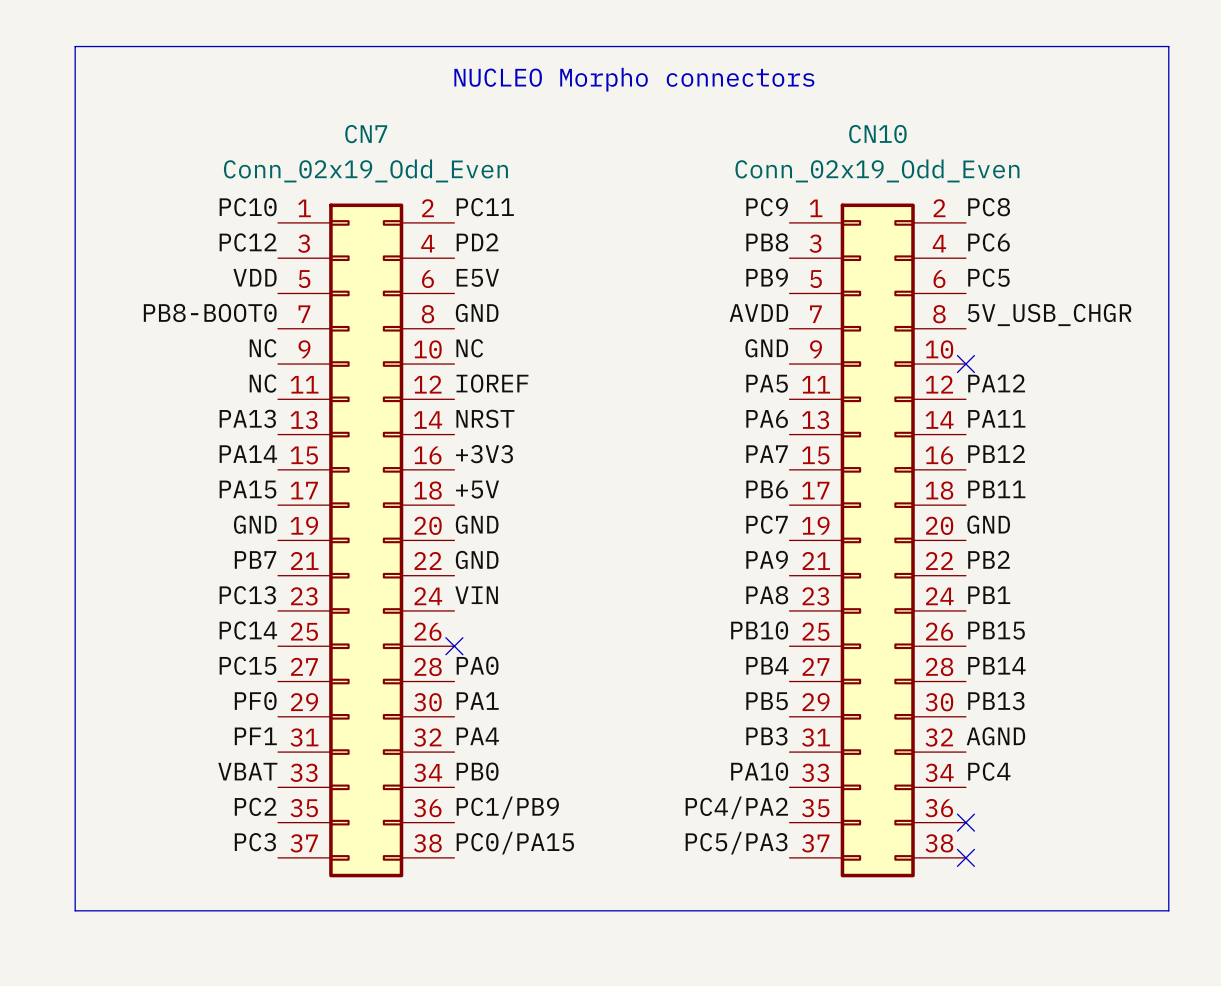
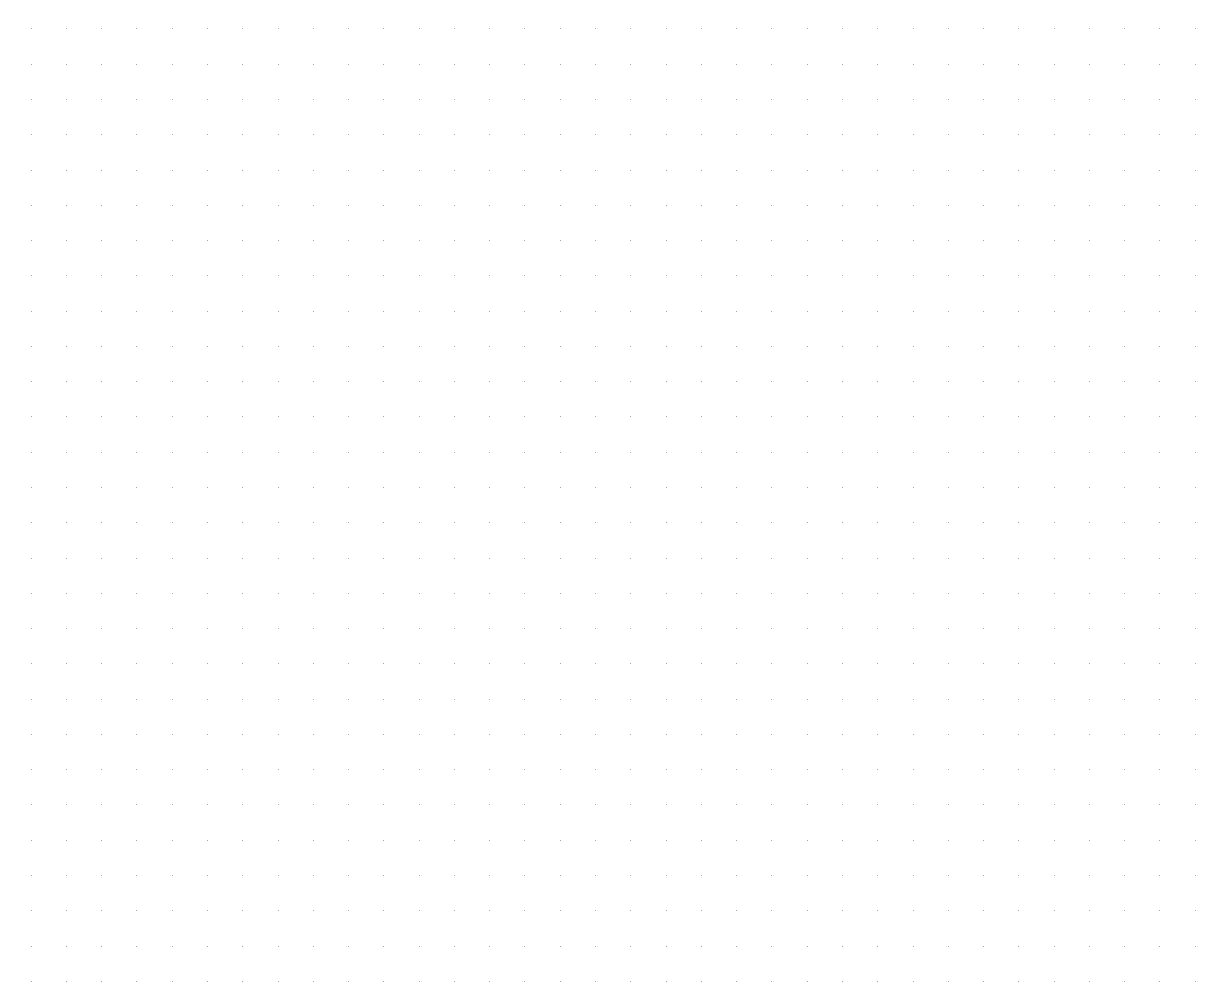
line: (75, 46) (1168, 46) (1168, 910) (75, 910) (75, 46) -> none
text: NUCLEO Morpho connectors (634, 79) -> none
label: PC10 (248, 207) -> none
label: PC11 (485, 207) -> none
label: PC9 (767, 207) -> none
label: PC8 (989, 207) -> none
label: PC12 (248, 242) -> none
label: PD2 (477, 242) -> none
label: PB8 (767, 242) -> none
label: PC6 (988, 242) -> none
label: VDD (255, 277) -> none
label: E5V (477, 277) -> none
label: PB9 (767, 277) -> none
label: PC5 (988, 277) -> none
label: PB8-BOOT0 (210, 313) -> none
label: GND (477, 313) -> none
label: AVDD (758, 313) -> none
label: 5V_USB_CHGR (1049, 314) -> none
label: NC (263, 348) -> none
label: NC (469, 348) -> none
label: GND (766, 348) -> none
no-connect mark: (965, 364) -> none
label: NC (263, 383) -> none
label: IOREF (492, 383) -> none
label: PA5 (767, 383) -> none
label: PA12 (996, 383) -> none
label: PA13 (247, 418) -> none
label: NRST (485, 418) -> none
label: PA6 (767, 418) -> none
label: PA11 (996, 418) -> none
label: PB12 (996, 453) -> none
label: PA14 (248, 454) -> none
label: +3V3 (484, 454) -> none
label: PA7 (767, 454) -> none
label: PA15 (247, 489) -> none
label: +5V (477, 489) -> none
label: PB6 (767, 489) -> none
label: PB11 (996, 489) -> none
label: GND (255, 524) -> none
label: GND (477, 524) -> none
label: PC7 (767, 524) -> none
label: GND (988, 524) -> none
CN7: Conn_02x19_Odd_Even (366, 540) -> none
CN10: Conn_02x19_Odd_Even (877, 540) -> none
label: PB7 (255, 559) -> none
label: GND (477, 559) -> none
label: PA9 (767, 559) -> none
label: PB2 (989, 559) -> none
label: PC13 (247, 595) -> none
label: VIN (476, 595) -> none
label: PA8 (767, 595) -> none
label: PB1 (989, 595) -> none
label: PC14 (248, 630) -> none
label: PB10 (759, 630) -> none
label: PB15 (996, 630) -> none
no-connect mark: (454, 646) -> none
label: PC15 (247, 665) -> none
label: PA0 (477, 665) -> none
label: PB4 (767, 665) -> none
label: PB14 (996, 665) -> none
label: PF0 (255, 701) -> none
label: PA1 (477, 701) -> none
label: PB5 (767, 701) -> none
label: PB13 (996, 701) -> none
label: PF1 (255, 736) -> none
label: PA4 (477, 736) -> none
label: PB3 (766, 736) -> none
label: AGND (995, 736) -> none
label: VBAT (247, 771) -> none
label: PB0 (477, 771) -> none
label: PA10 (759, 771) -> none
label: PC4 (989, 771) -> none
label: PC2 (255, 806) -> none
label: PC1/PB9 (507, 807) -> none
label: PC4/PA2 (736, 807) -> none
no-connect mark: (965, 822) -> none
label: PC3 (255, 842) -> none
label: PC0/PA15 (515, 843) -> none
label: PC5/PA3 (736, 843) -> none
no-connect mark: (965, 857) -> none

